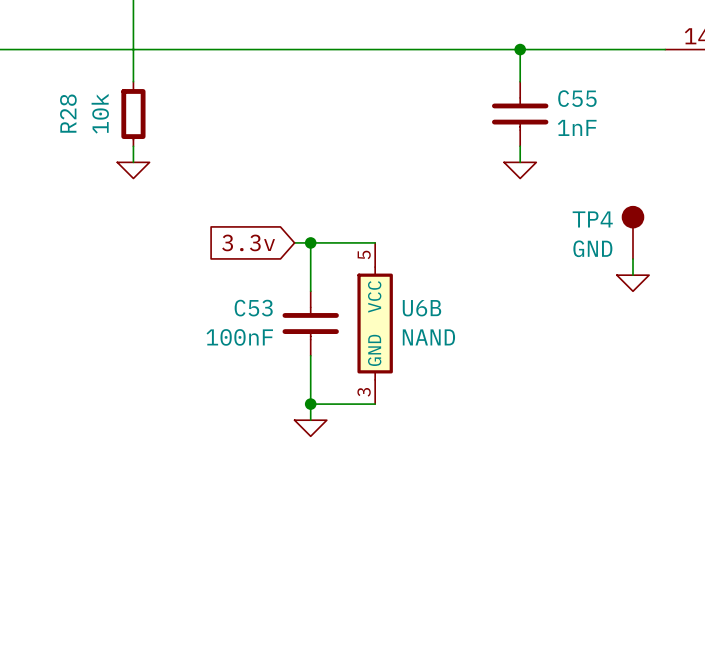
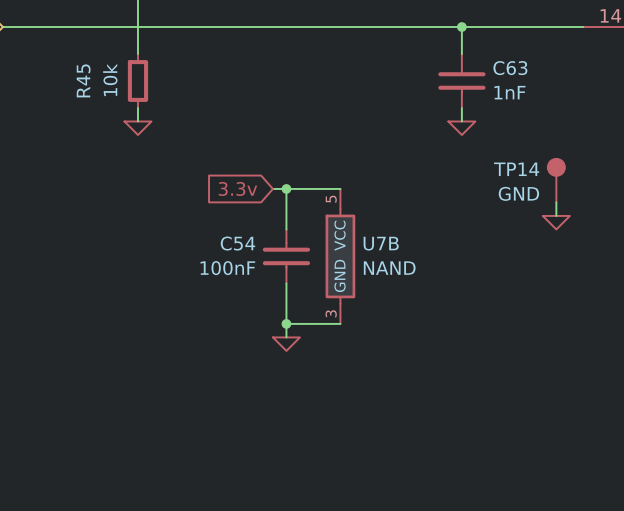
C55 name: C55 (577, 98) -> C63 (510, 68)
R28 name: R28 (68, 113) -> R45 (83, 80)
TP4 name: TP4 (592, 219) -> TP14 (516, 169)
C53 name: C53 (253, 308) -> C54 (237, 243)
U6B name: U6B (421, 308) -> U7B (381, 243)

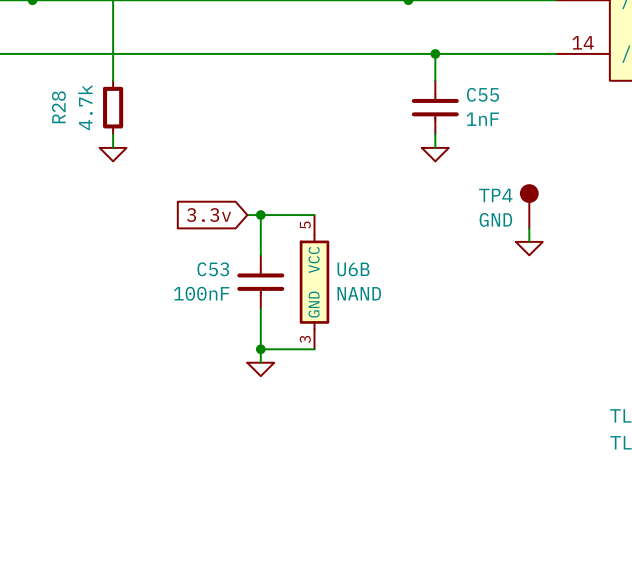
C63 name: C63 (510, 68) -> C55 (483, 94)
R45 name: R45 (83, 80) -> R28 (58, 107)
R45 value: 10k (110, 80) -> 4.7k (85, 107)
TP14 name: TP14 (516, 169) -> TP4 (495, 195)
C54 name: C54 (237, 243) -> C53 (213, 269)
U7B name: U7B (381, 243) -> U6B (353, 269)

